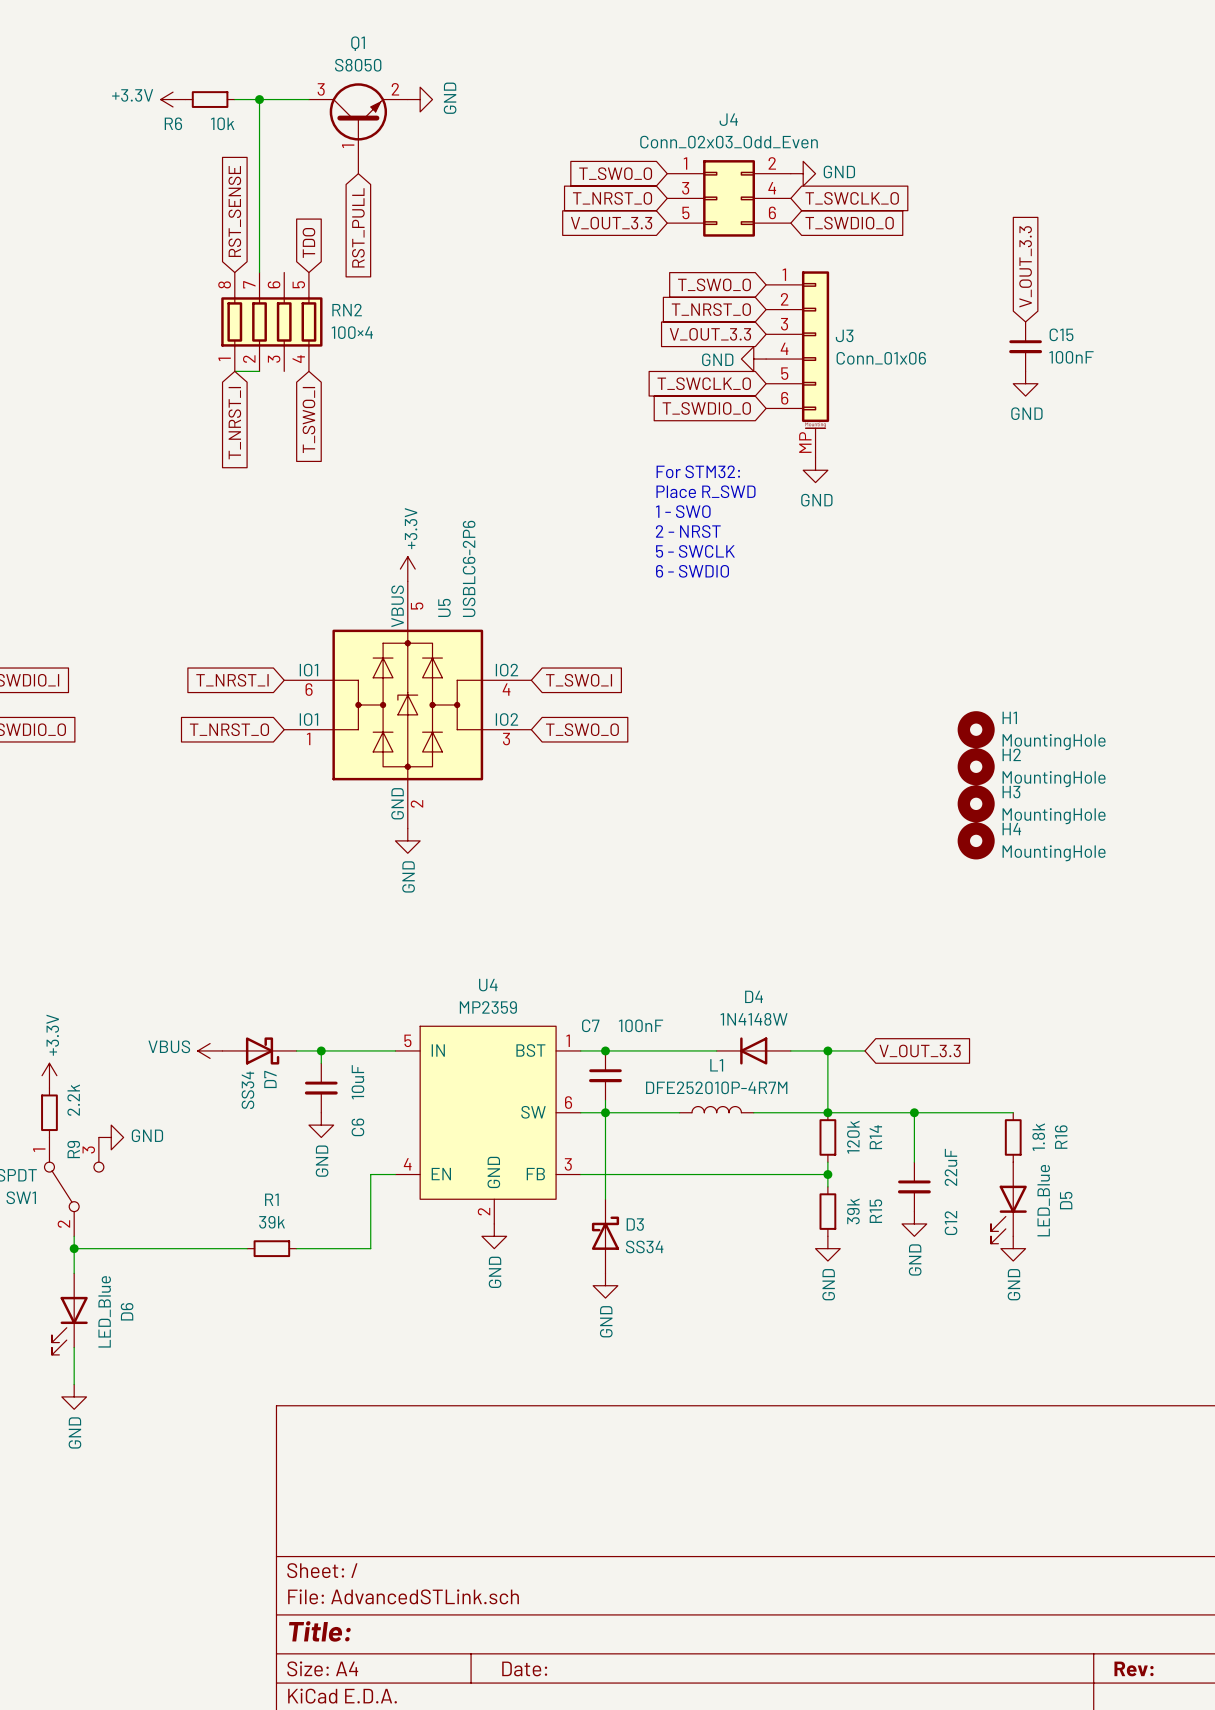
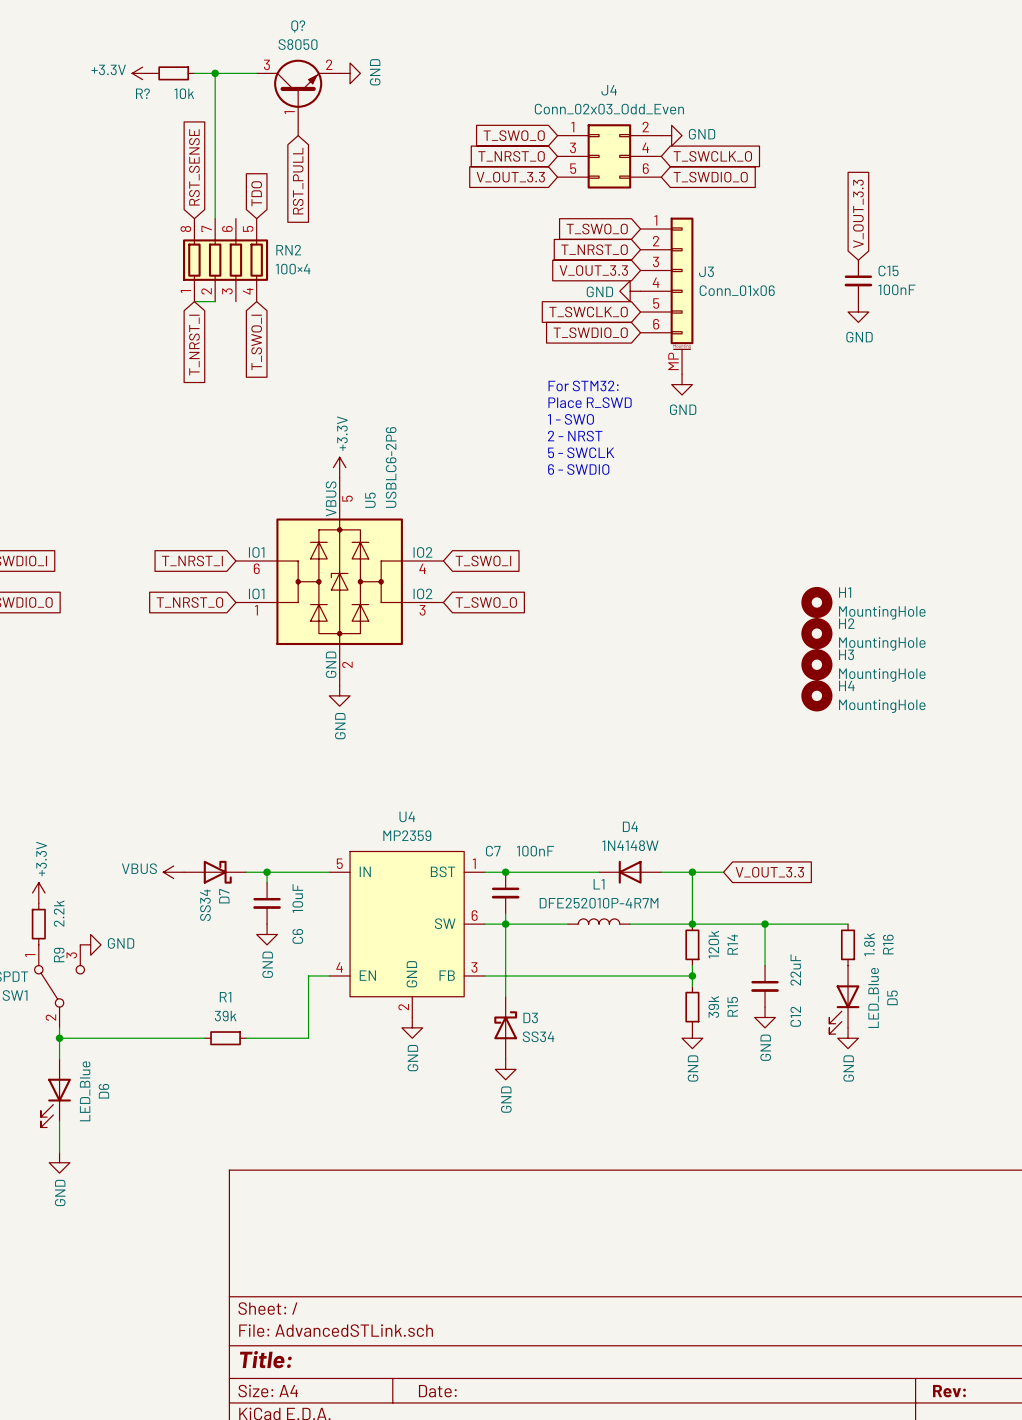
Q1 name: Q1 (358, 43) -> Q? (298, 26)
R6 name: R6 (173, 123) -> R? (142, 93)

